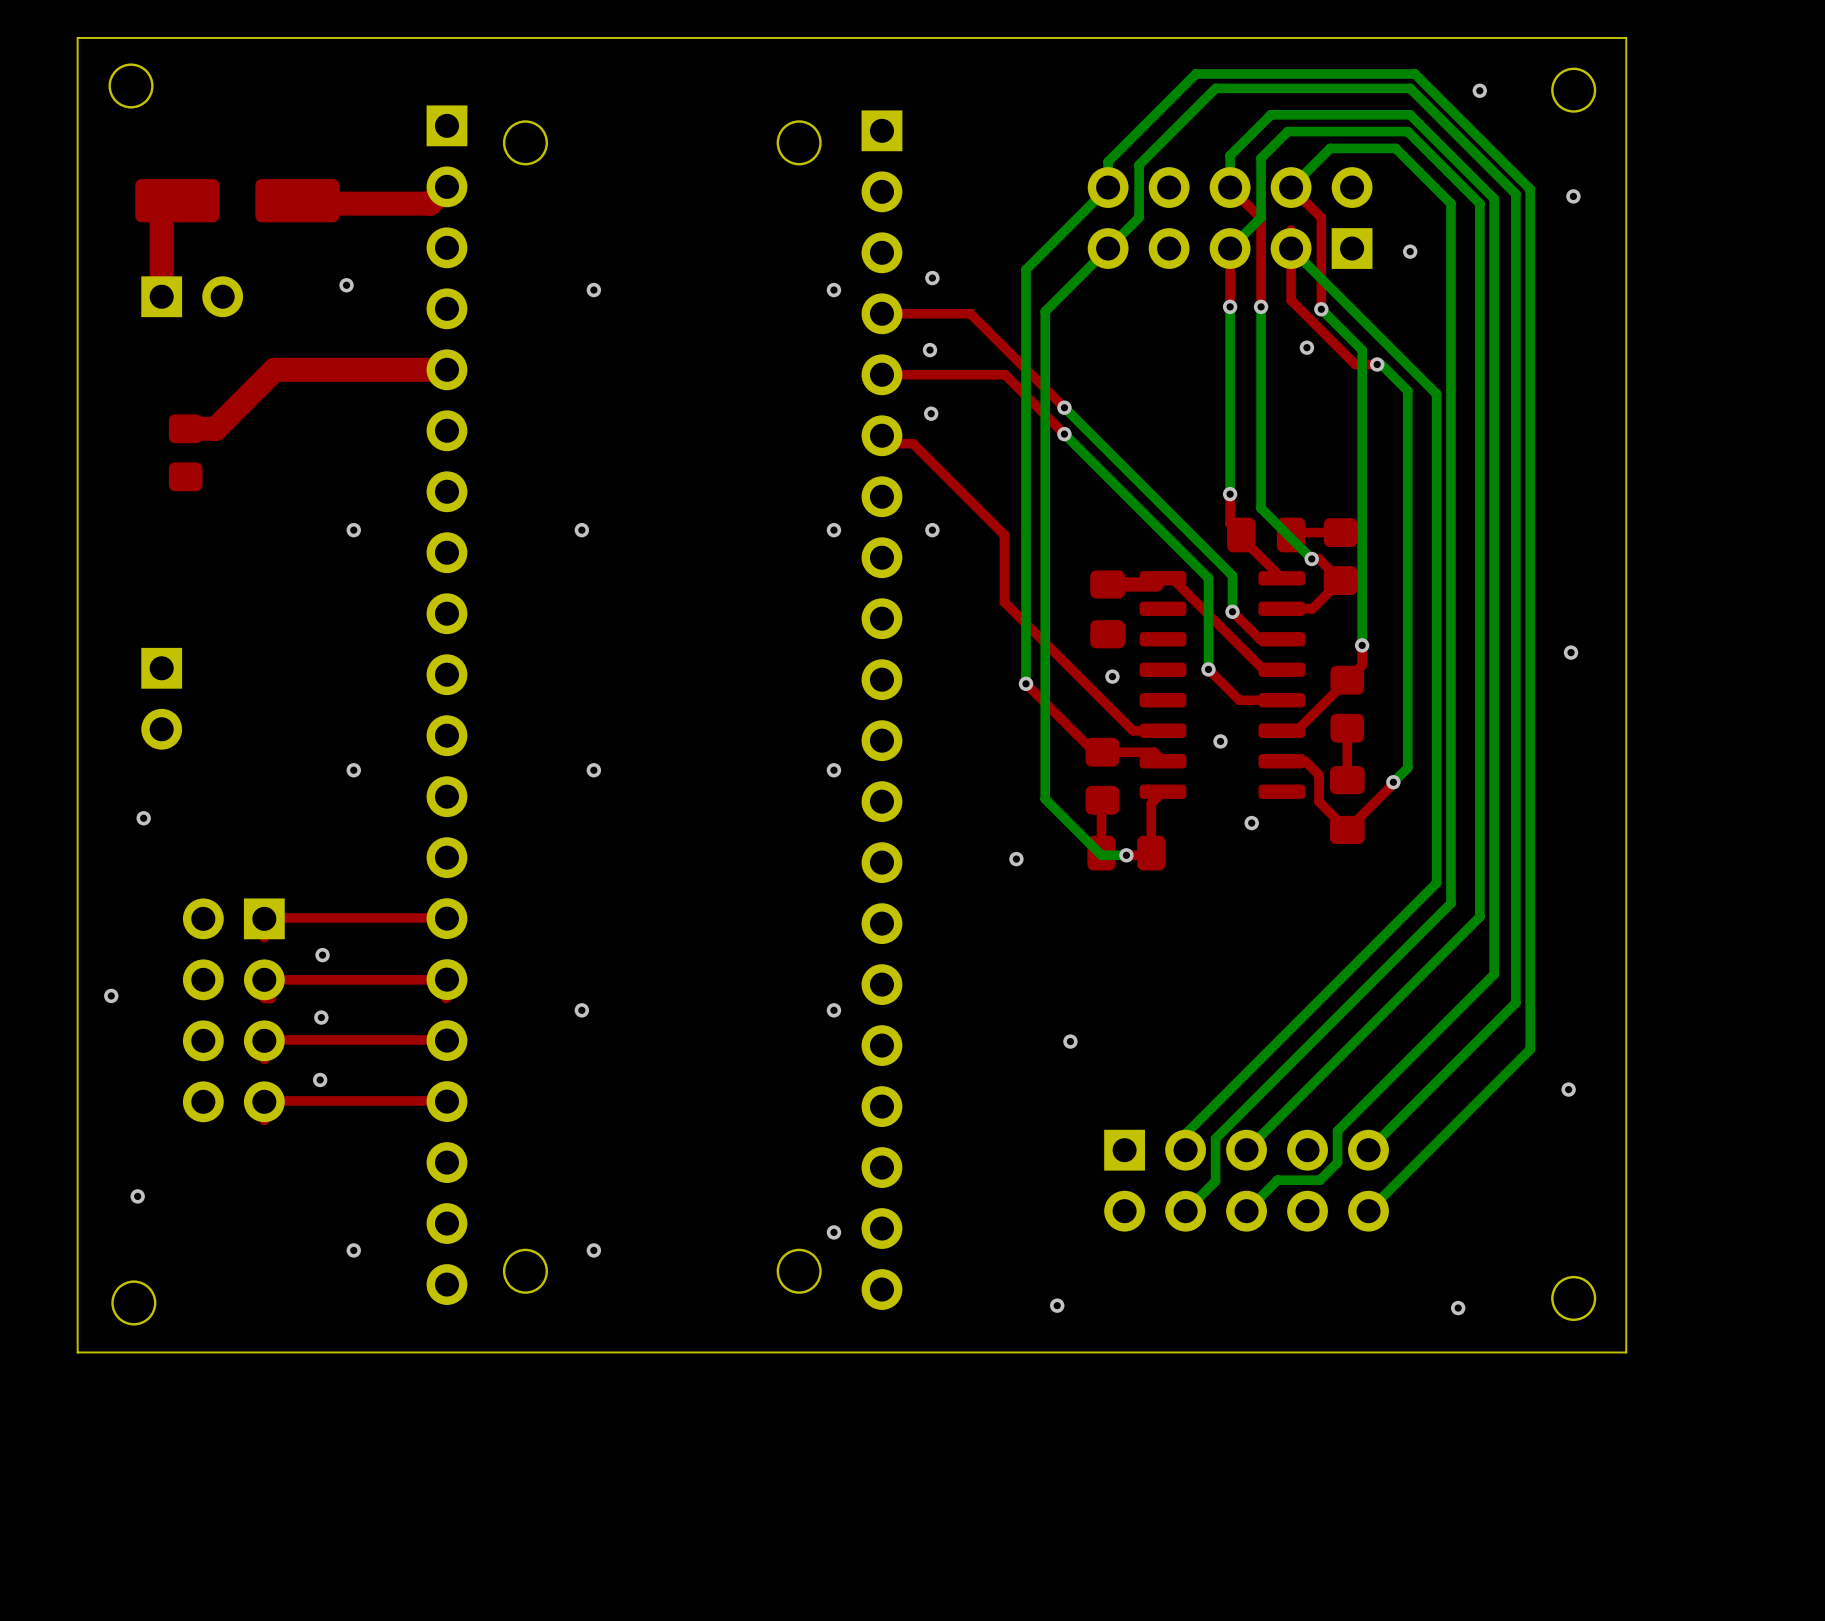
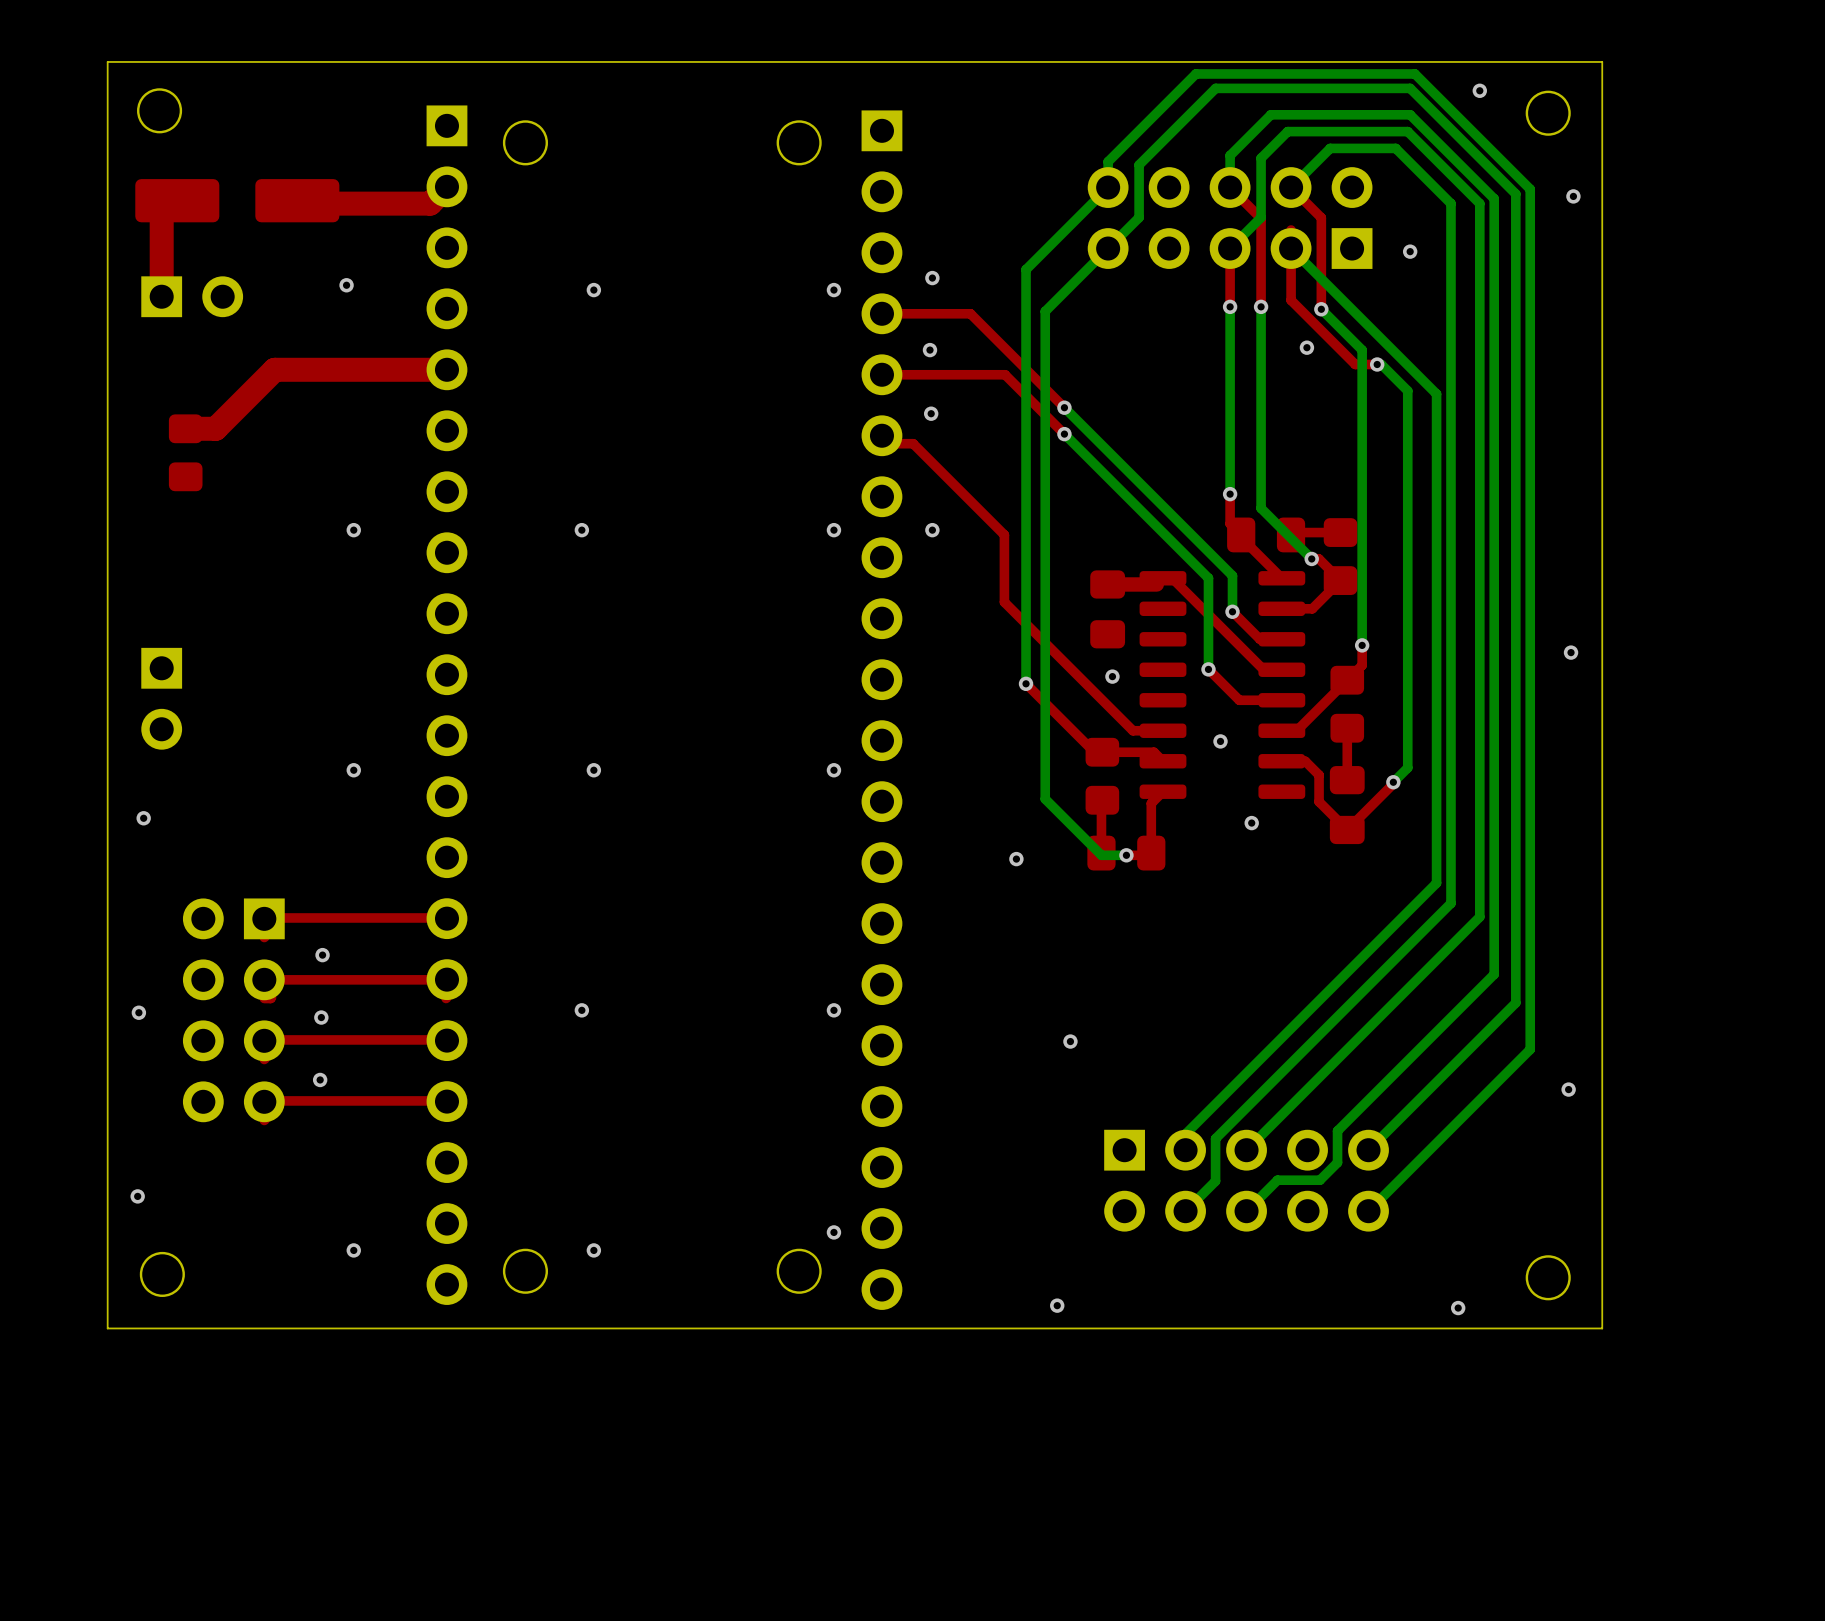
board edge: (1626, 37) (77, 37) (77, 1352) (1626, 1352) (1626, 37) -> (1602, 61) (1602, 1328) (107, 1328) (107, 61) (1602, 61)
round board edge position: (131, 85) -> (159, 110)
round board edge position: (1573, 90) -> (1548, 113)
via position: (111, 995) -> (138, 1012)
round board edge position: (1573, 1298) -> (1548, 1277)
round board edge position: (133, 1302) -> (162, 1274)

